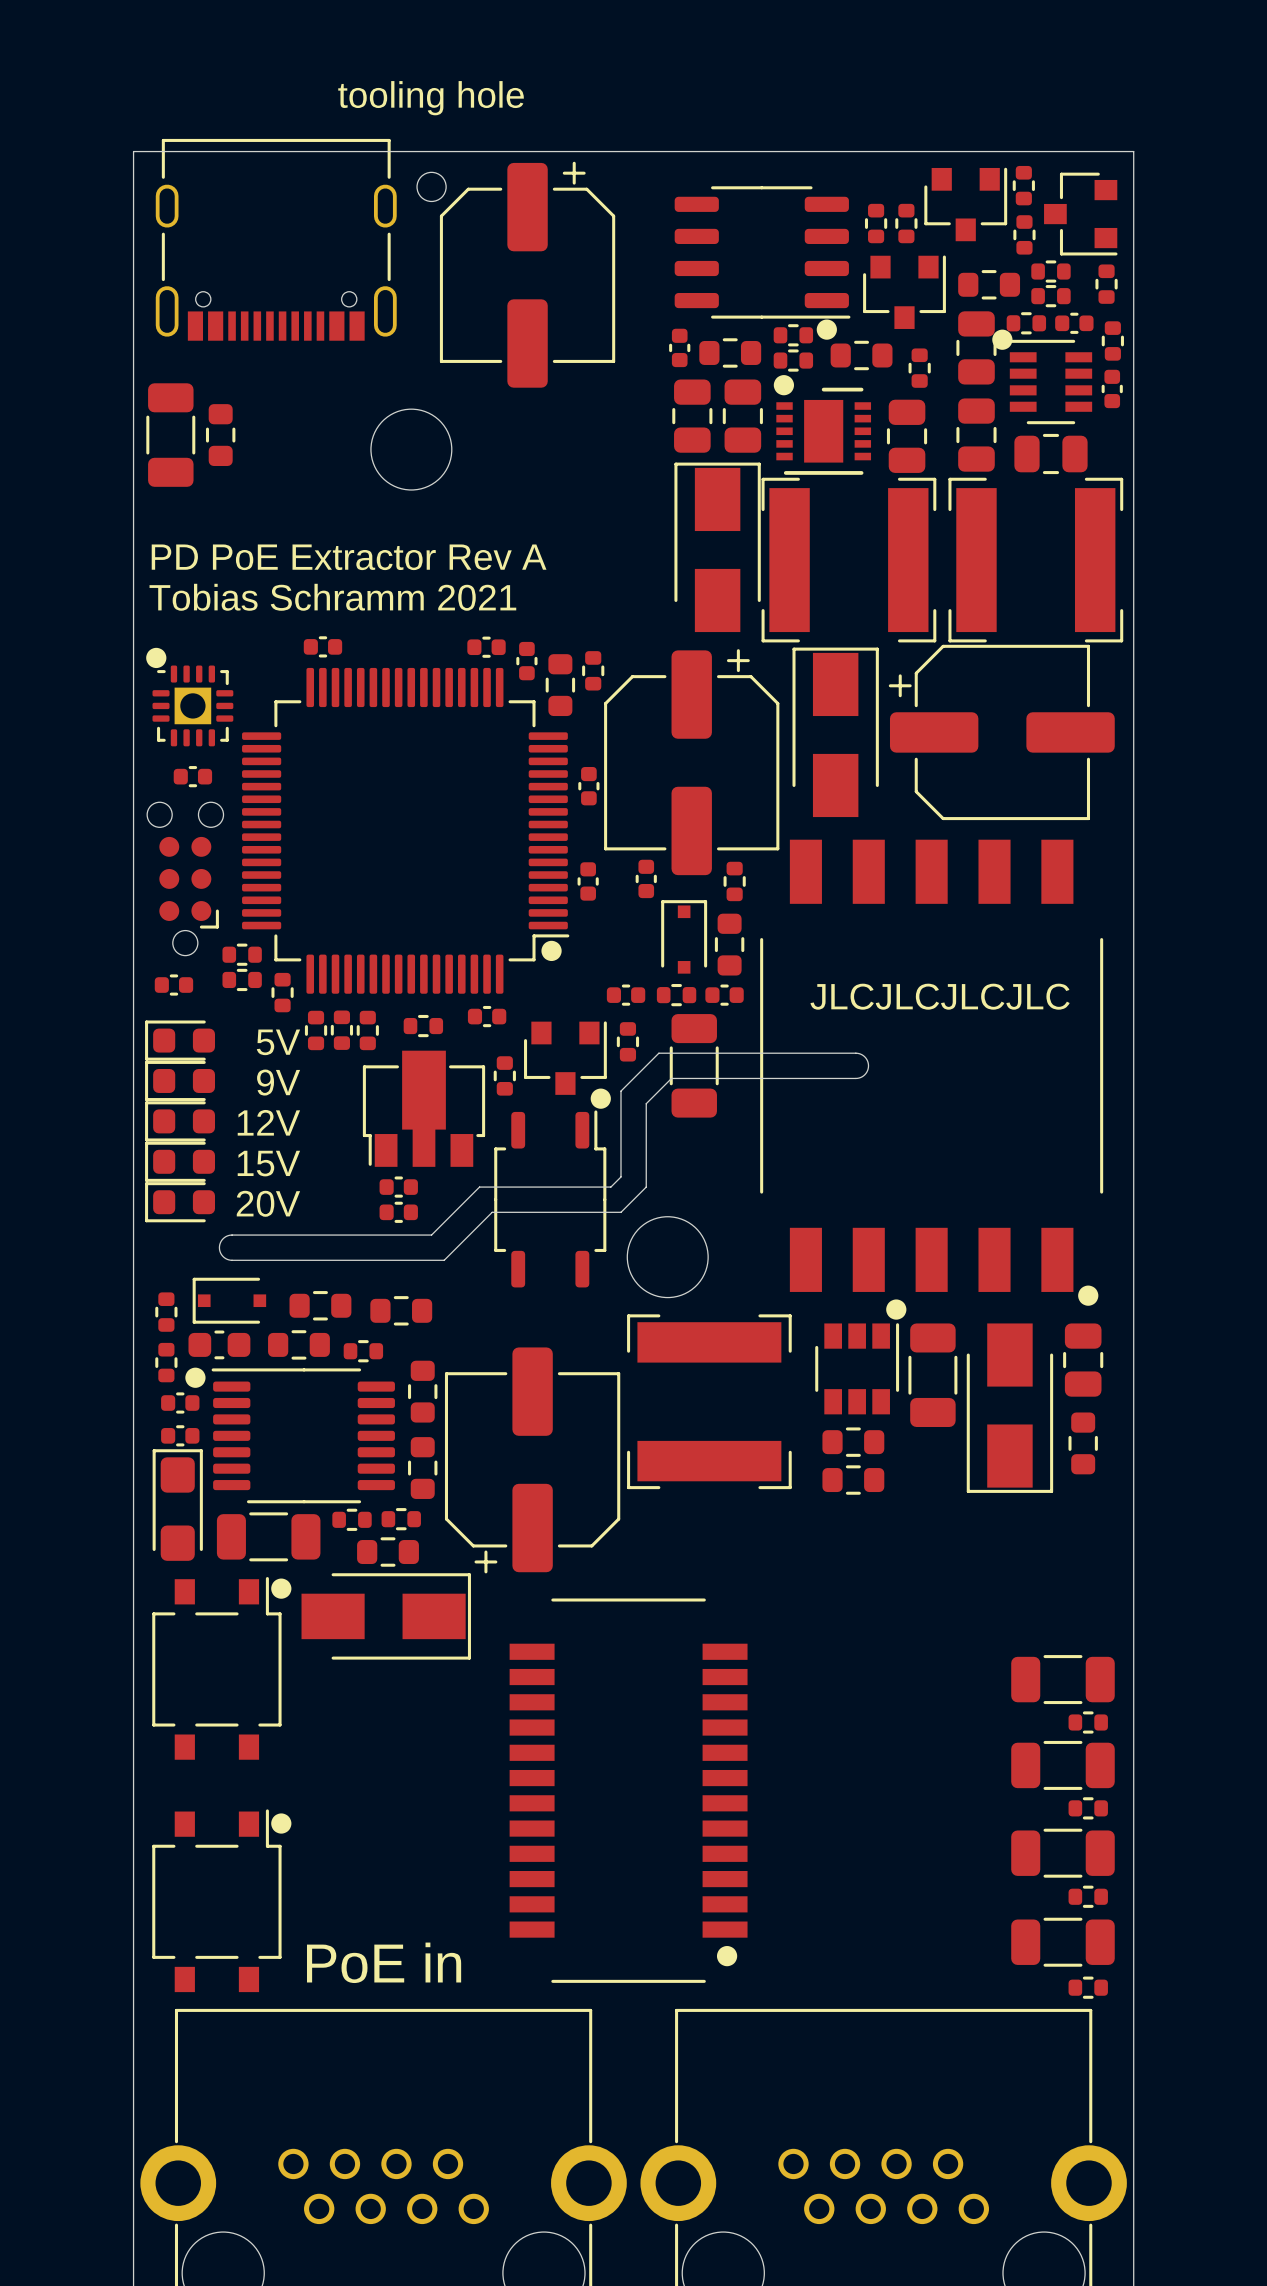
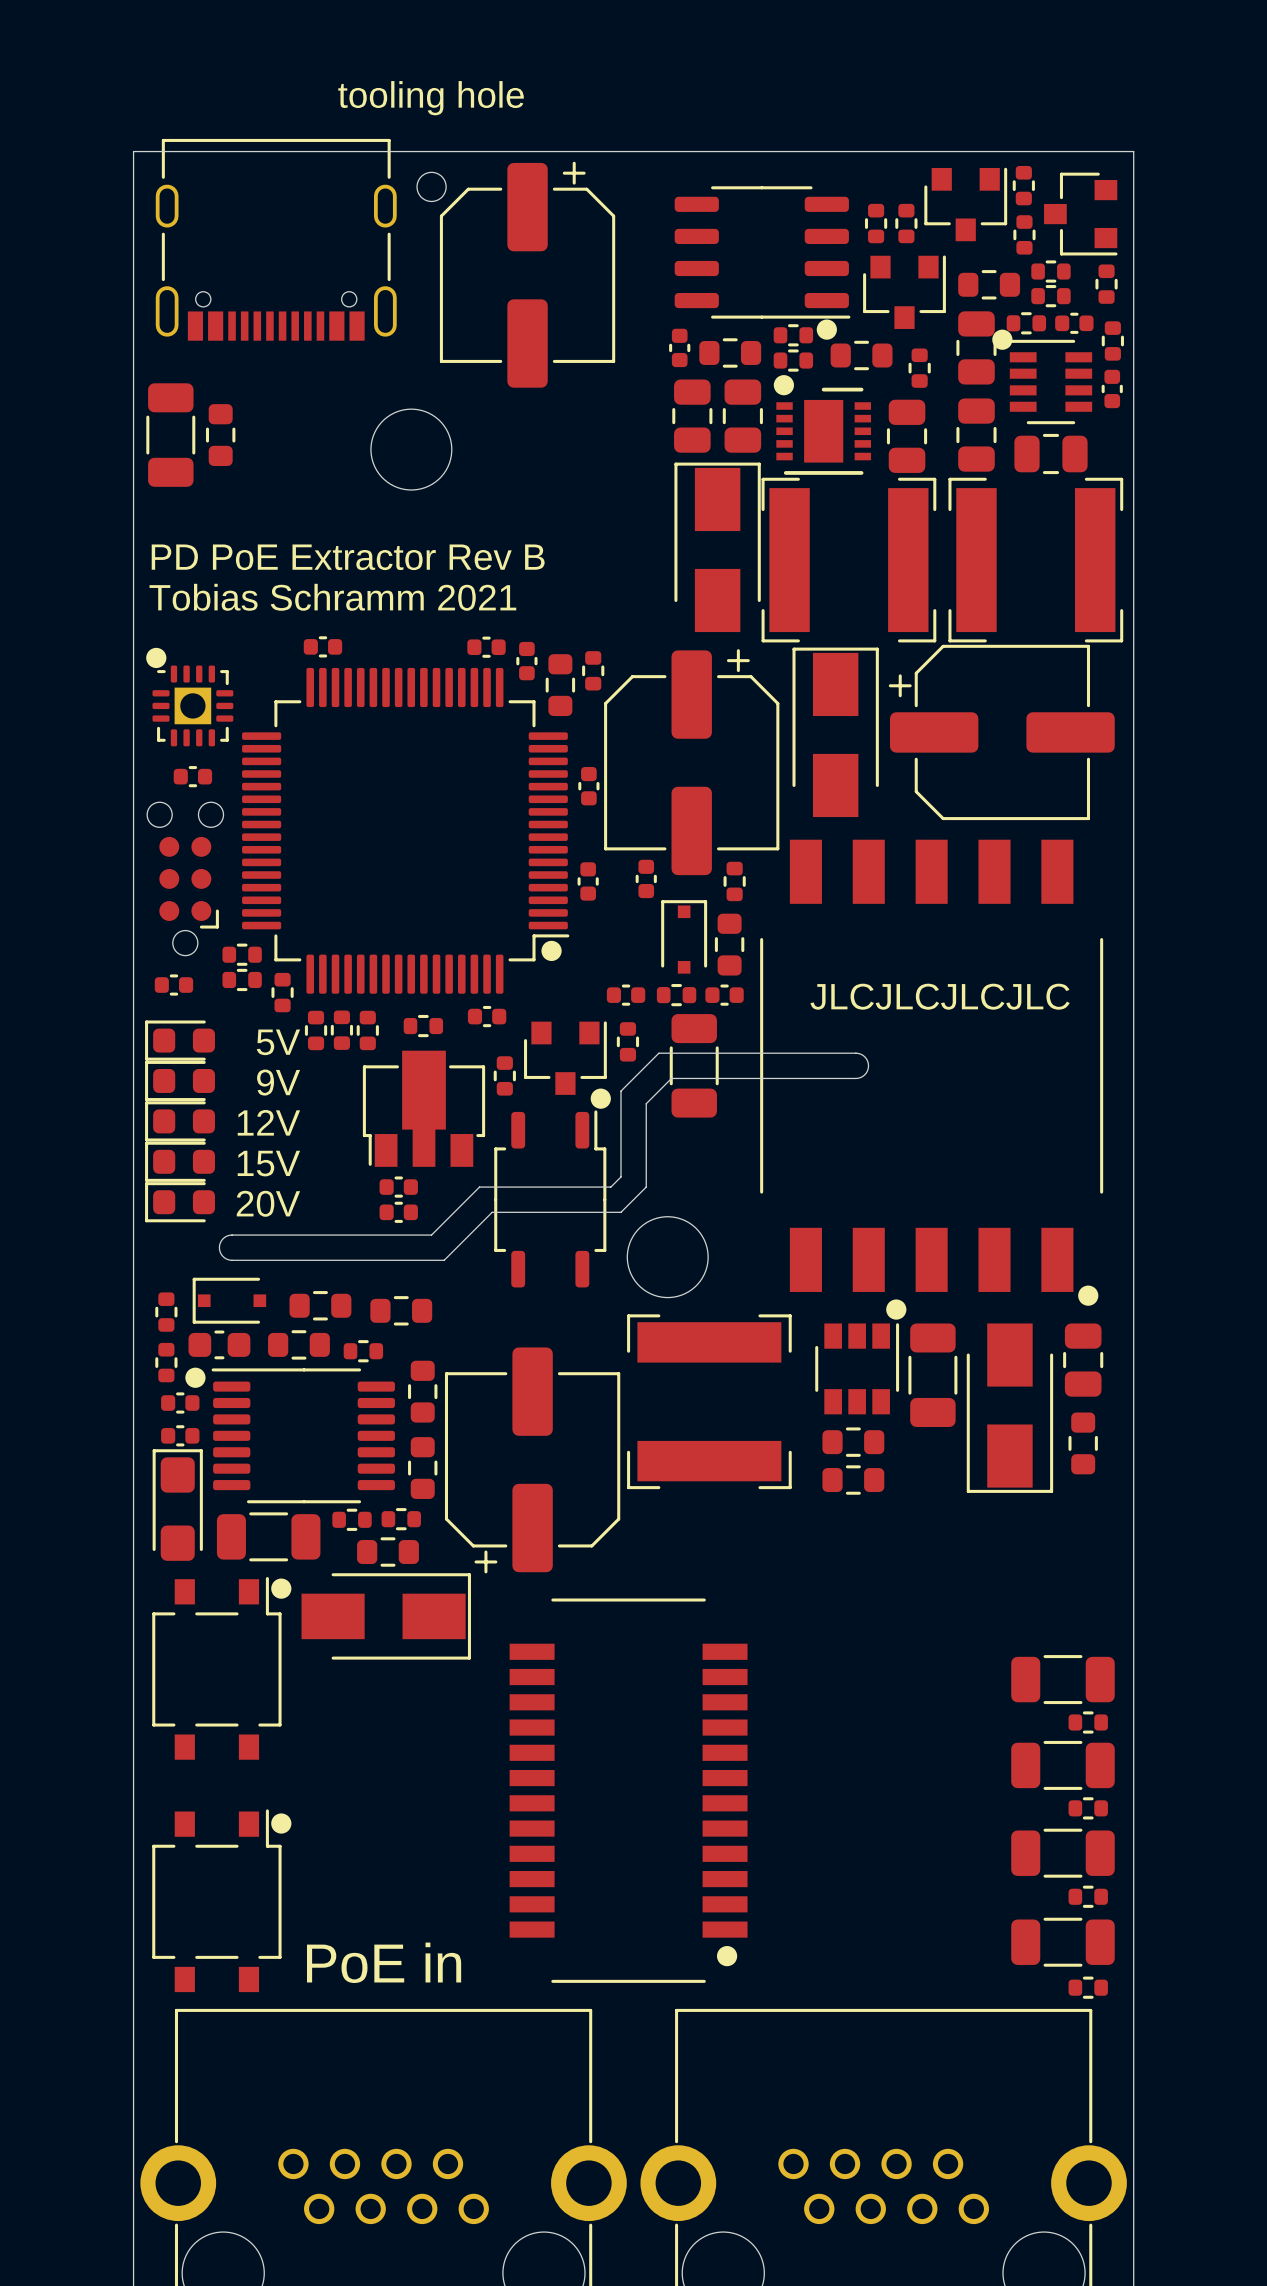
text: PD PoE Extractor Rev A (349, 557) -> PD PoE Extractor Rev B (348, 557)

